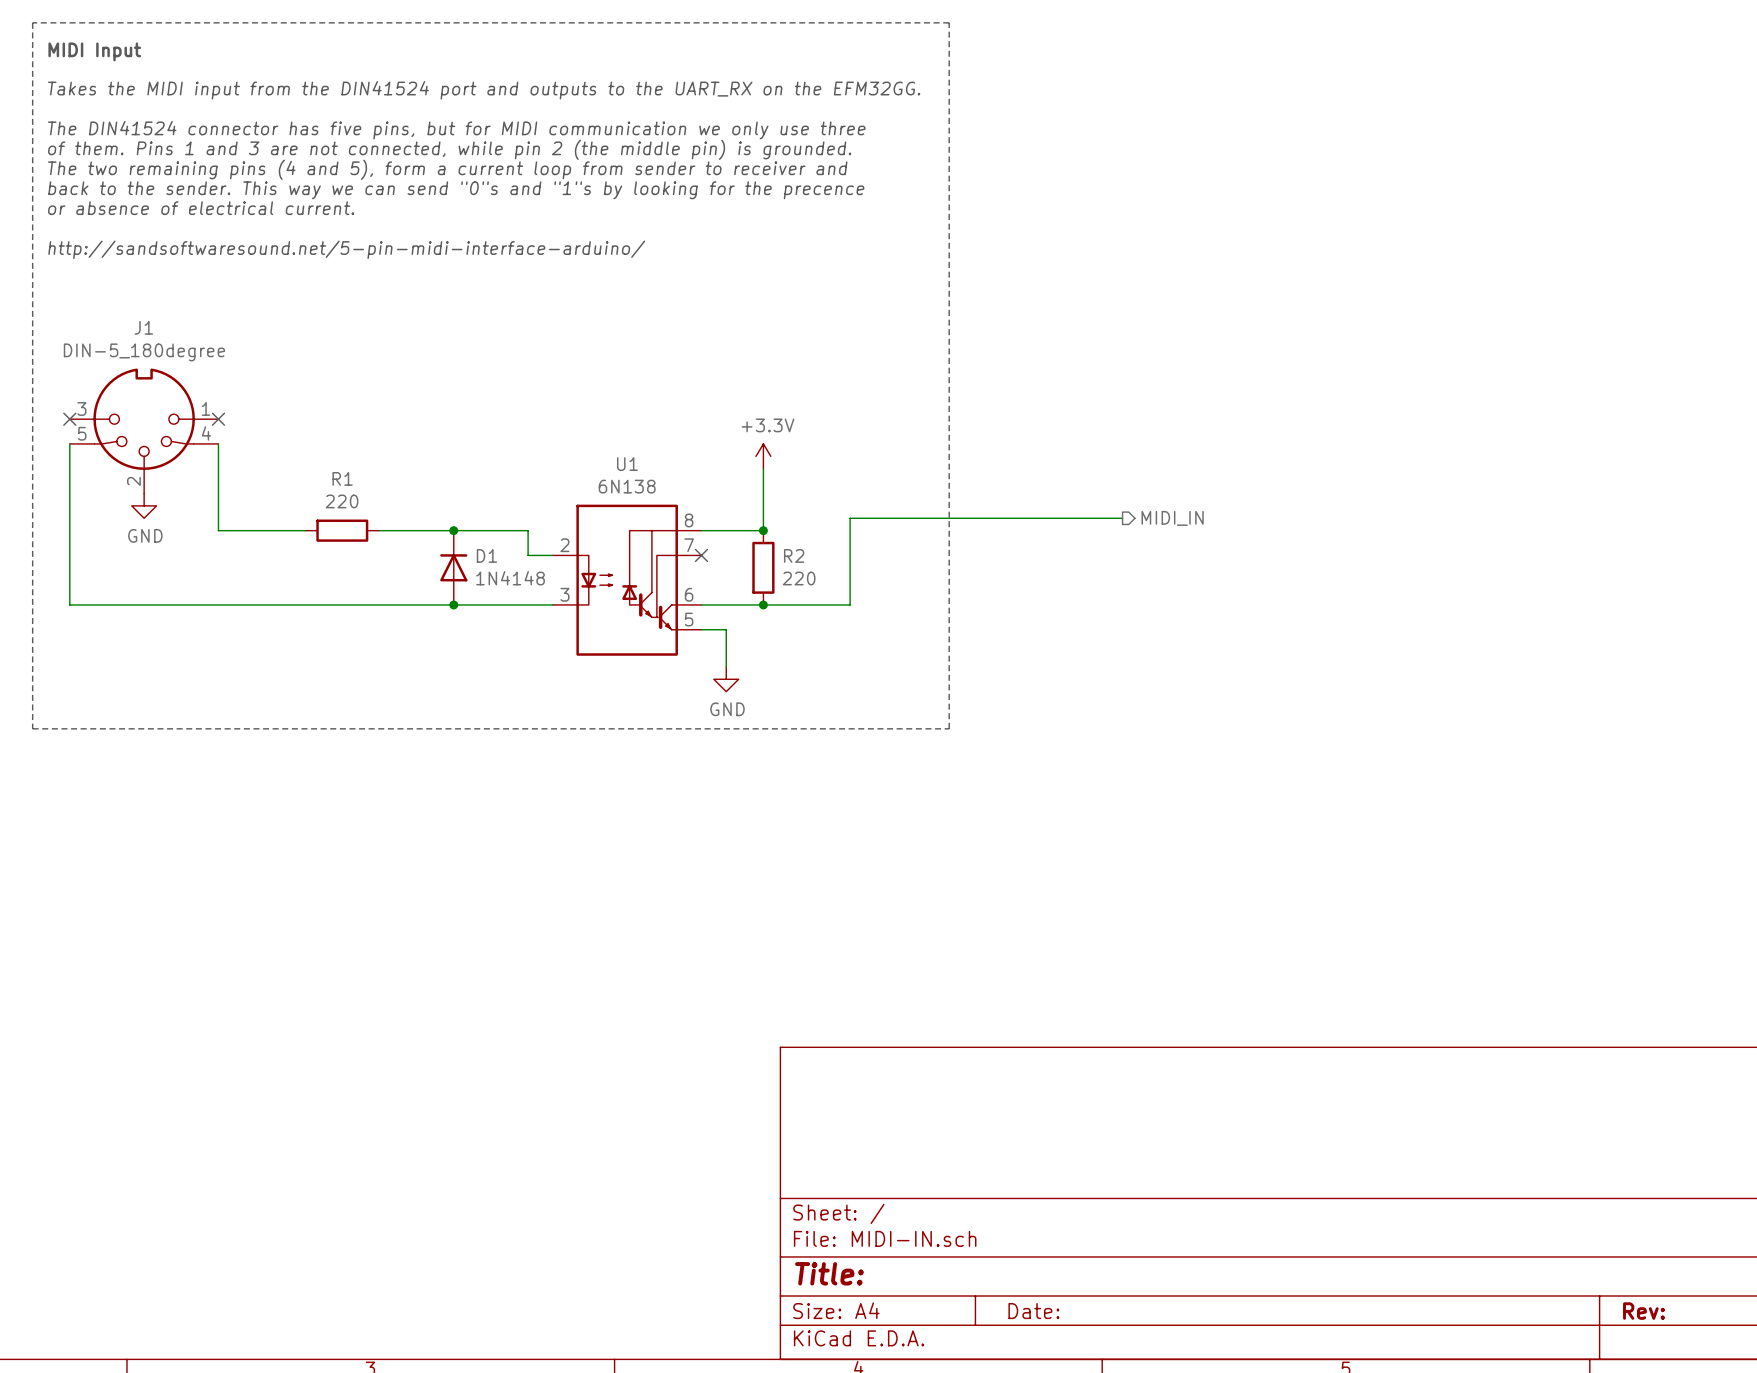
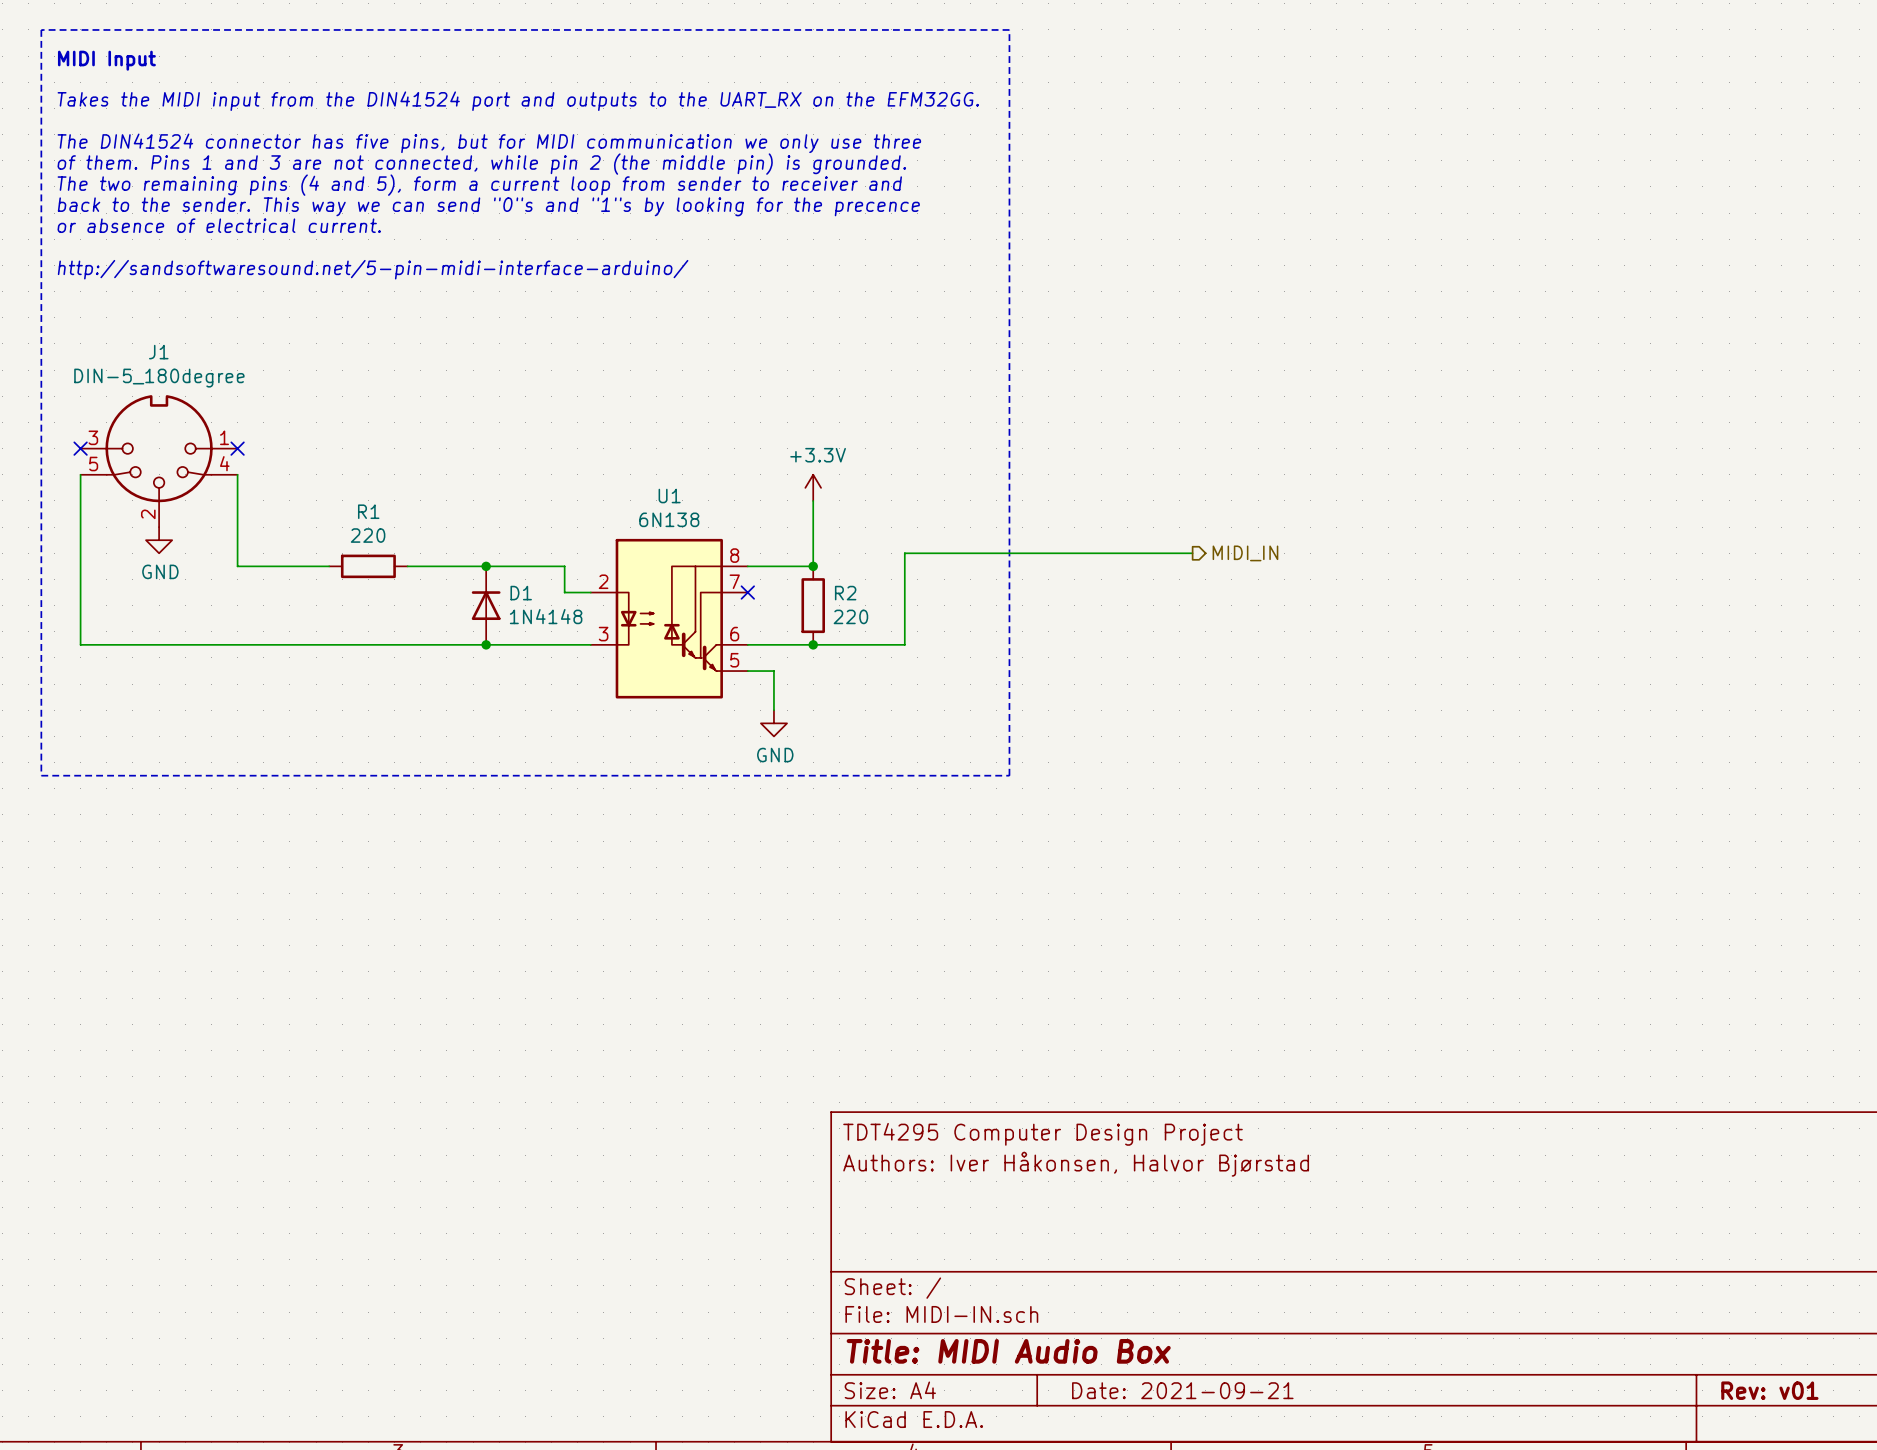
title block: none -> TDT4295 Computer Design Project (1043, 1134)
title block: none -> Authors: Iver Håkonsen, Halvor Bjørstad (1076, 1164)
title block: Title: (829, 1273) -> Title: MIDI Audio Box (1008, 1351)
title block: Date: (1033, 1311) -> Date: 2021-09-21 (1182, 1390)
title block: Rev: (1644, 1311) -> Rev: v01 (1769, 1390)

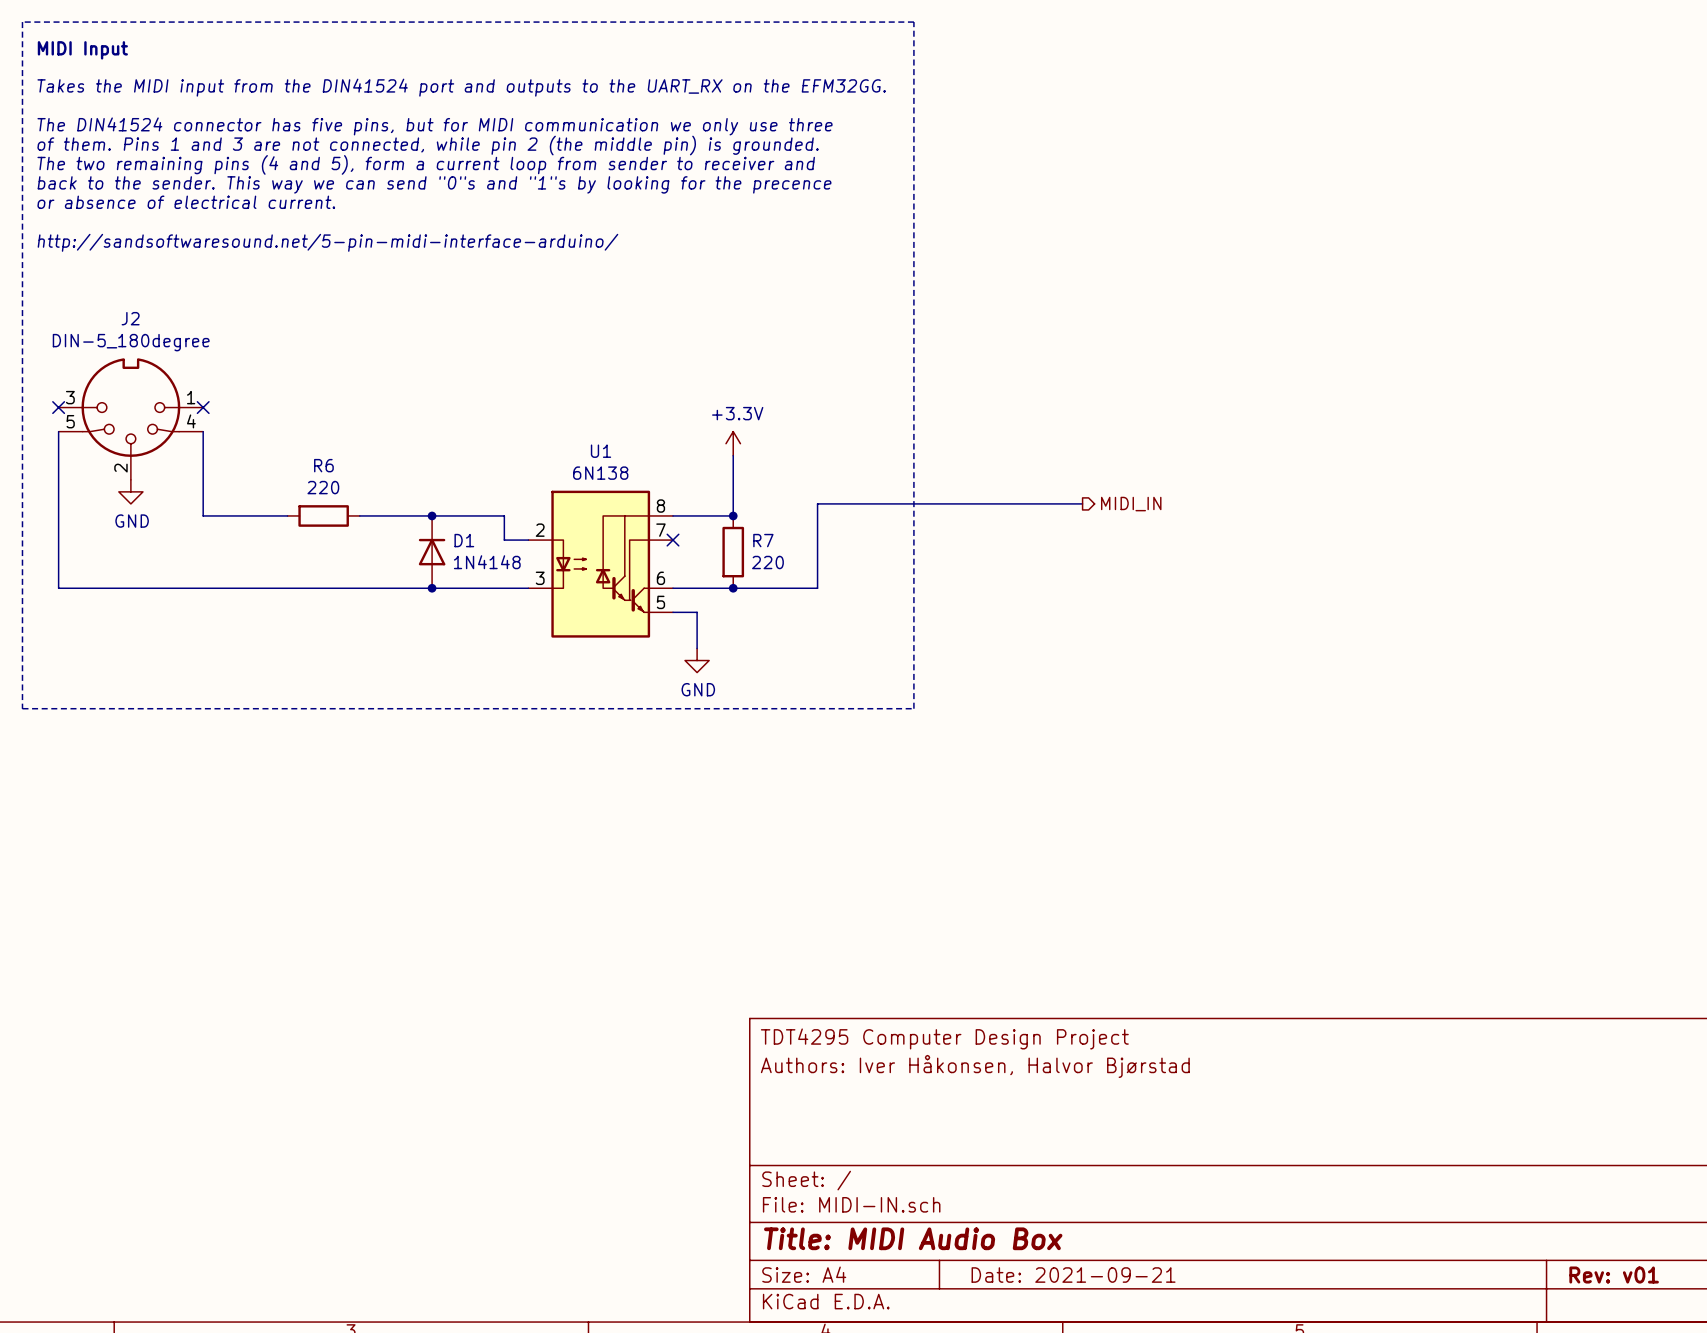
J1 name: J1 (158, 352) -> J2 (130, 318)
R1 name: R1 (368, 511) -> R6 (323, 465)
R2 name: R2 (845, 593) -> R7 (763, 540)

